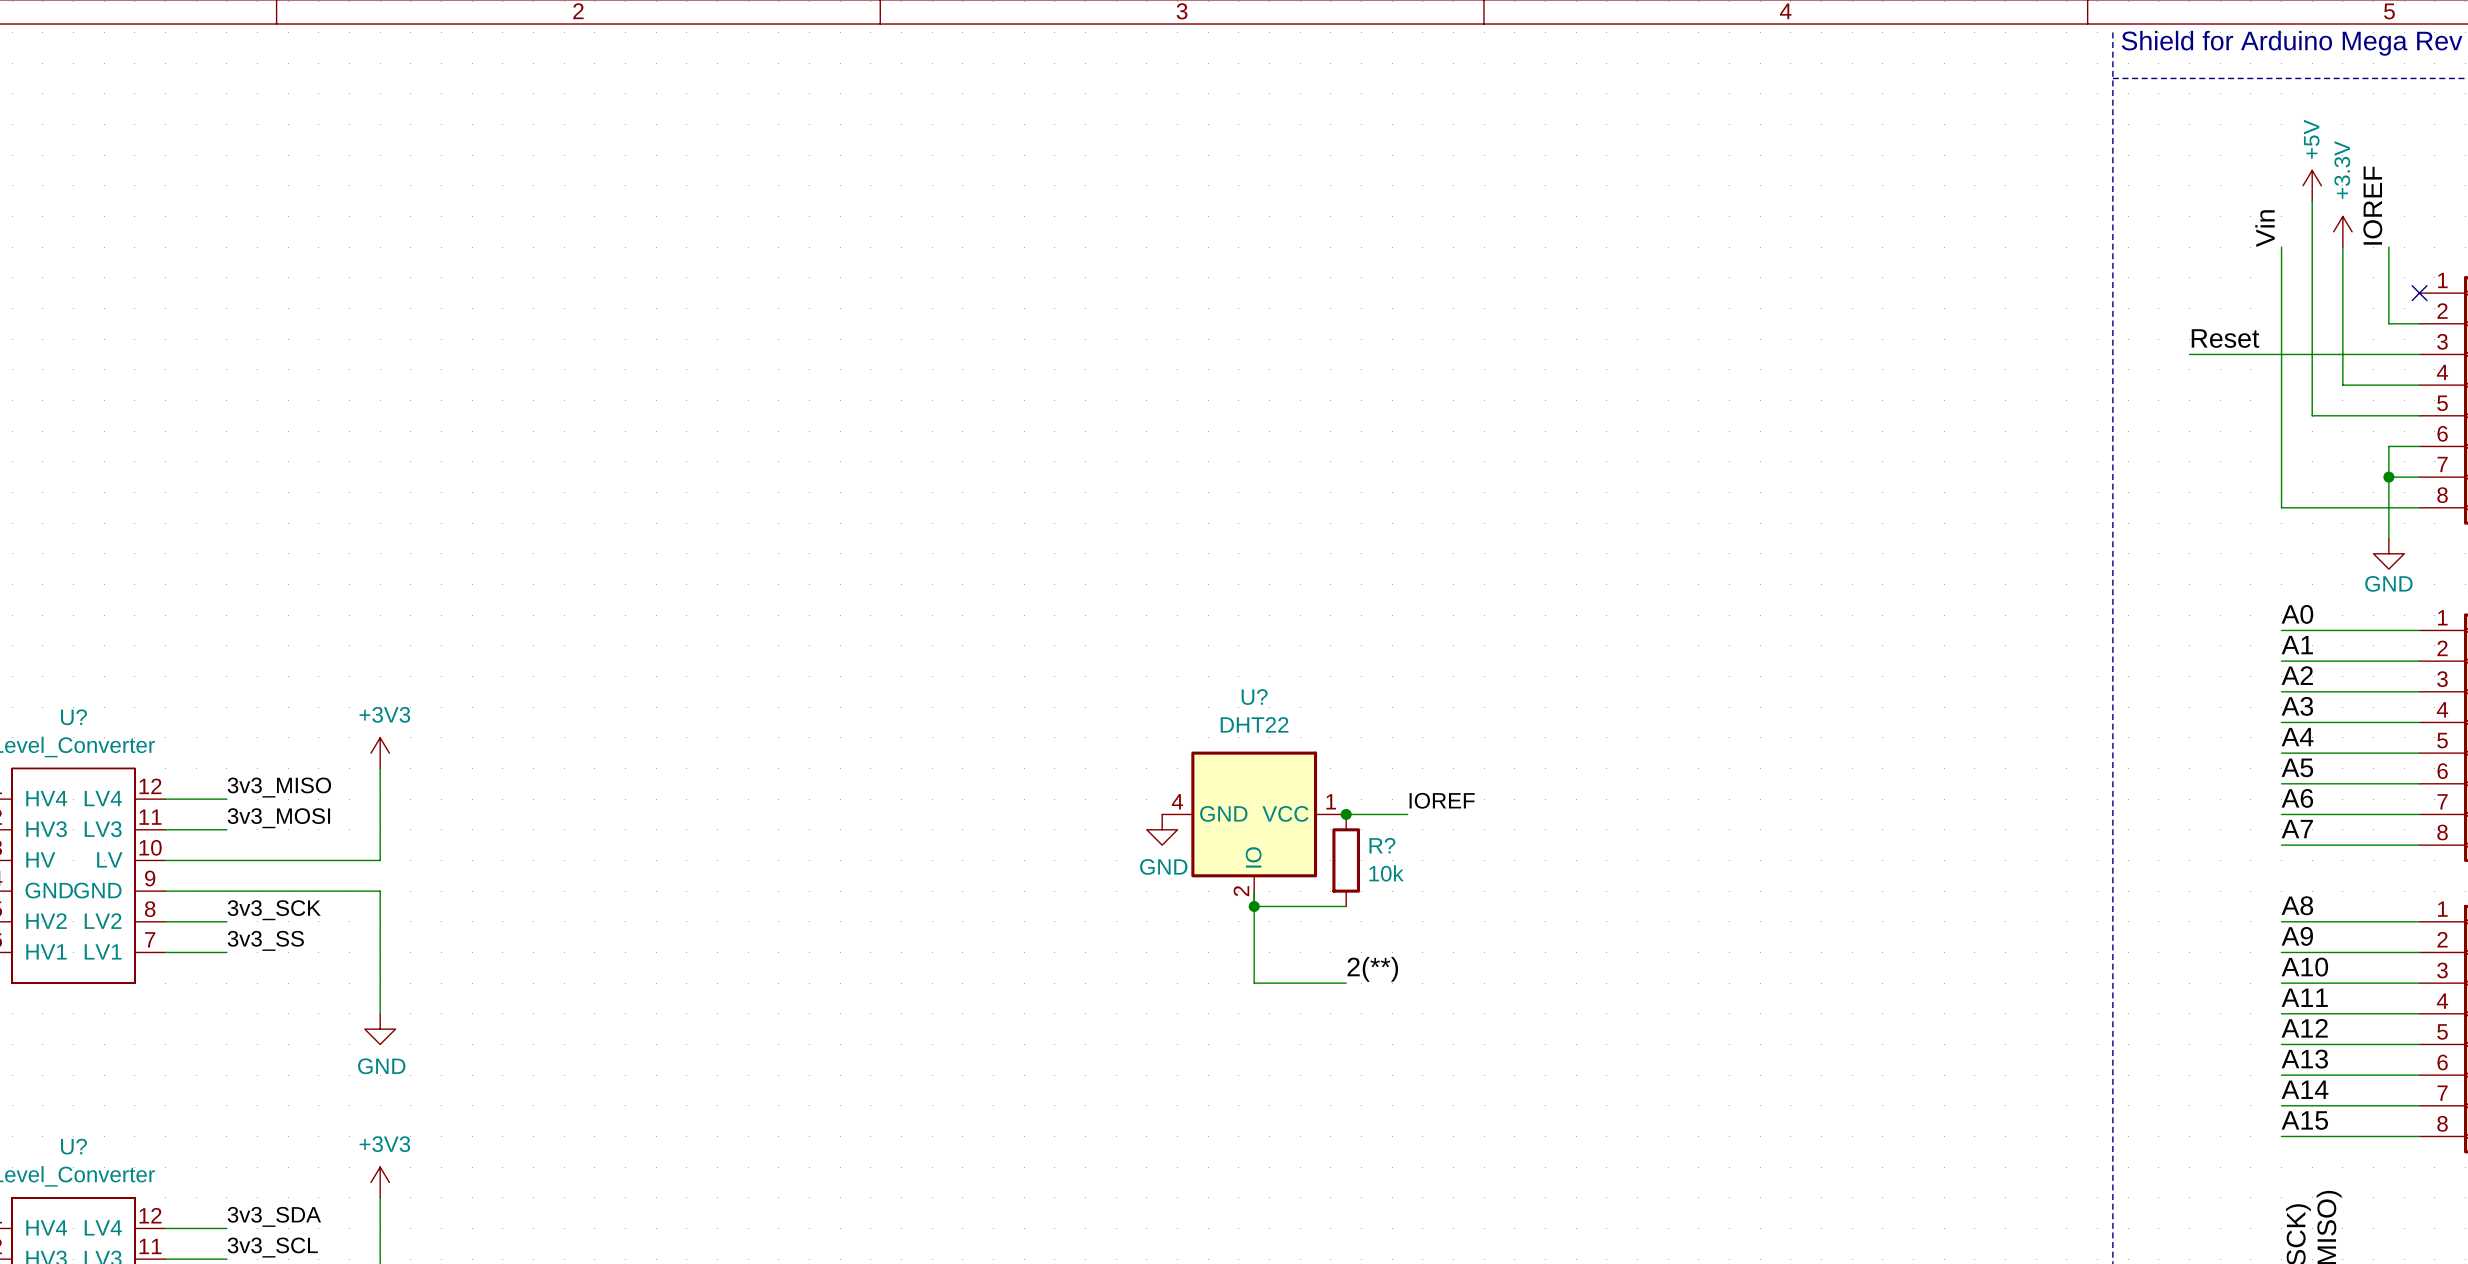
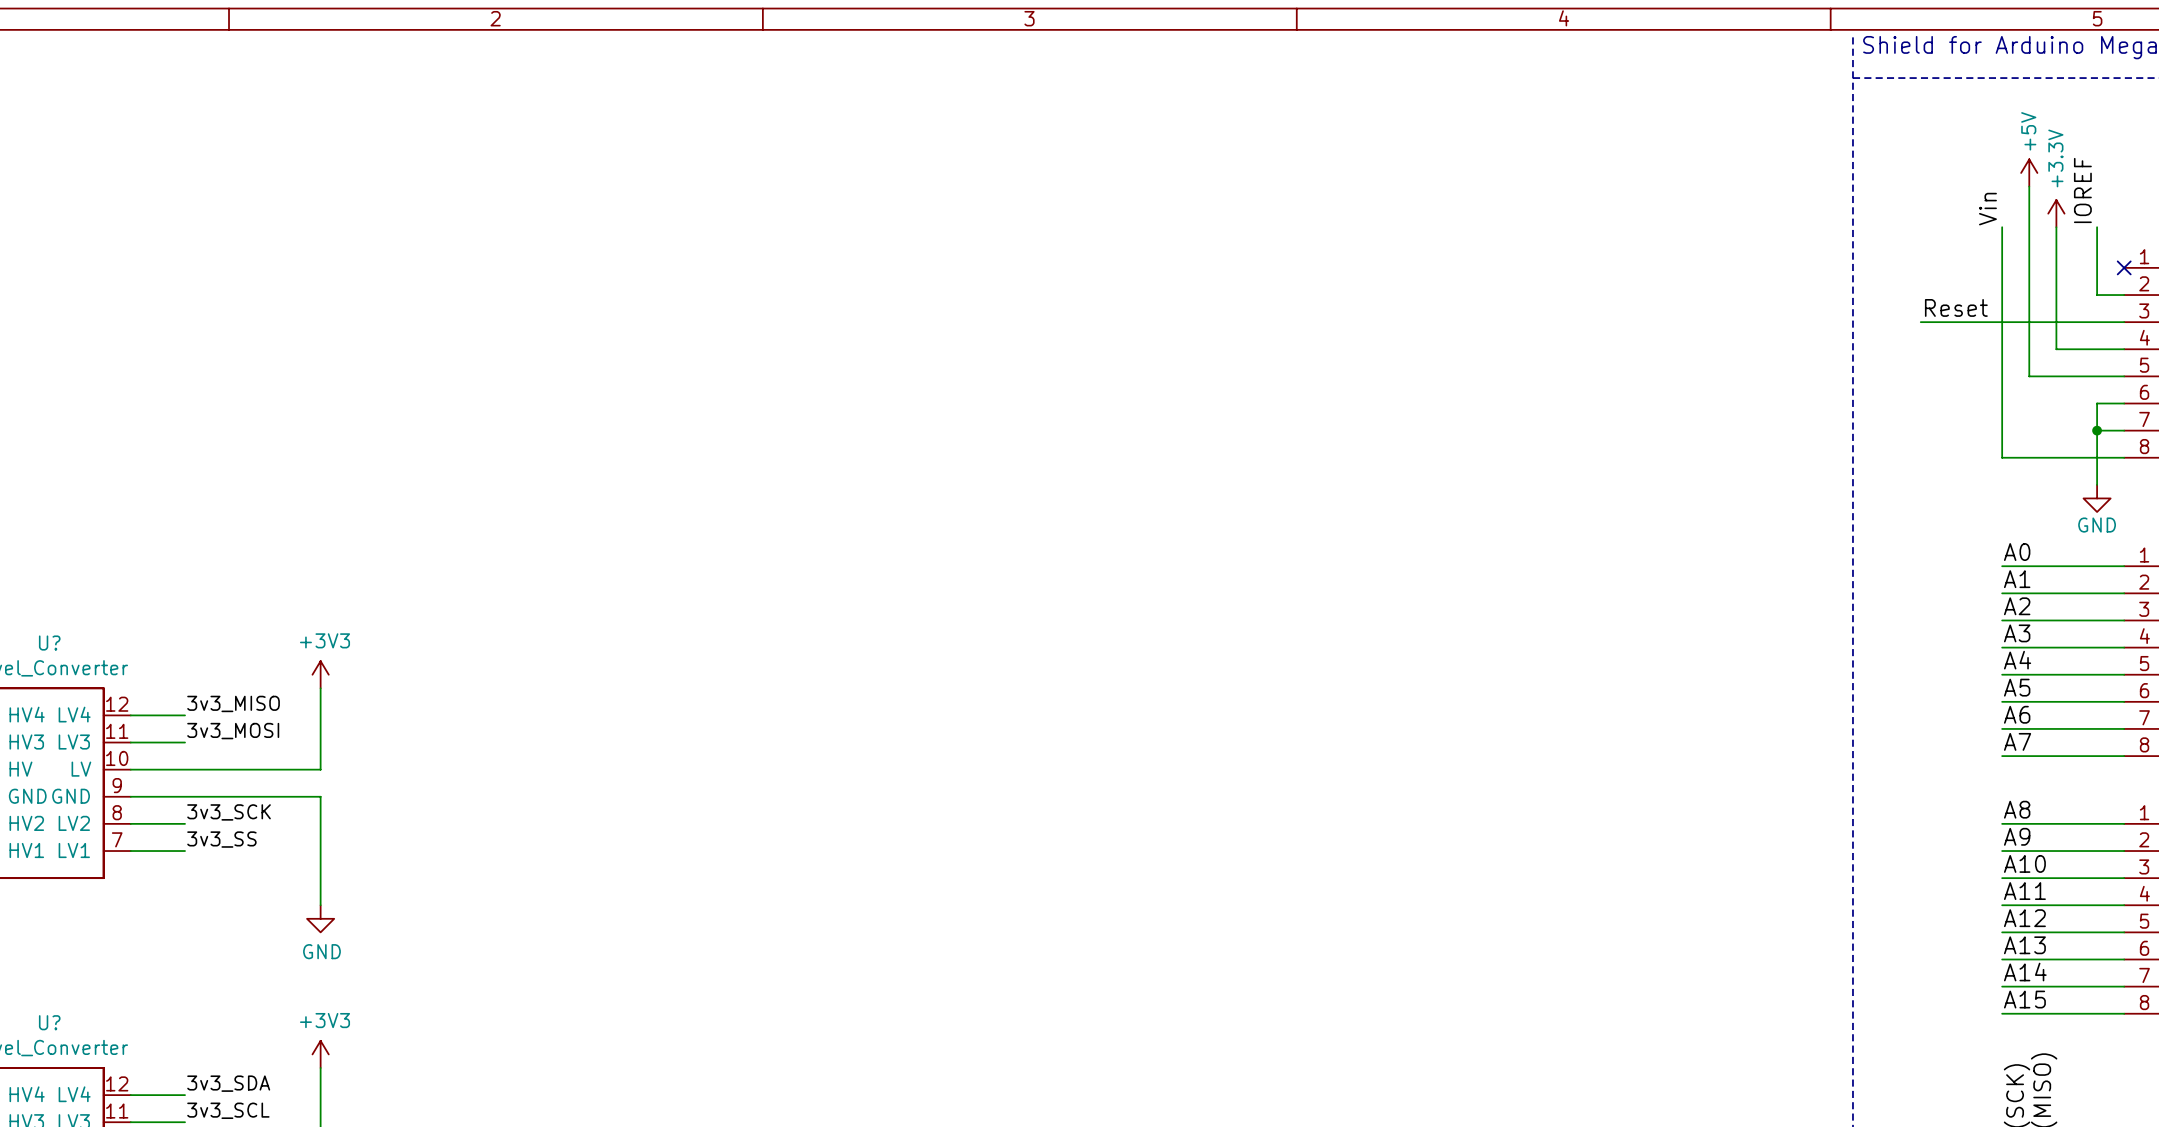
label: IOREF (1442, 800) -> none
wire: (1346, 814) (1407, 814) -> none
junction: (1346, 814) -> none
power symbol: GND (1162, 829) -> none
U?: DHT22 (1254, 829) -> none
R?: 10k (1346, 860) -> none
wire: (1254, 891) (1254, 983) (1346, 983) -> none
wire: (1254, 906) (1346, 906) -> none
junction: (1254, 906) -> none
label: 2(**) (1372, 969) -> none

